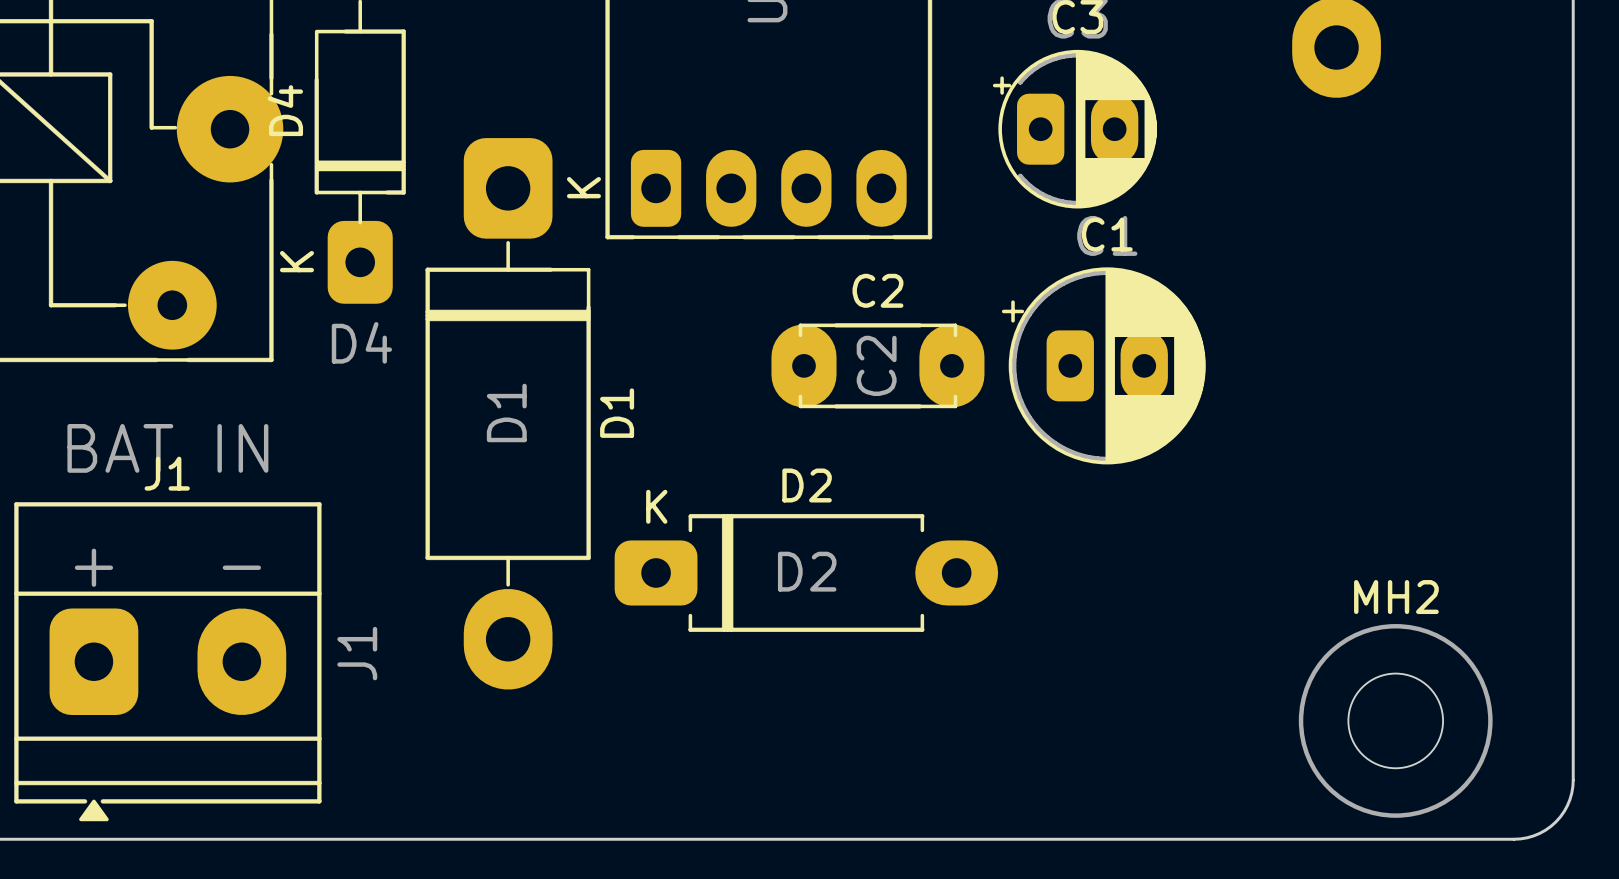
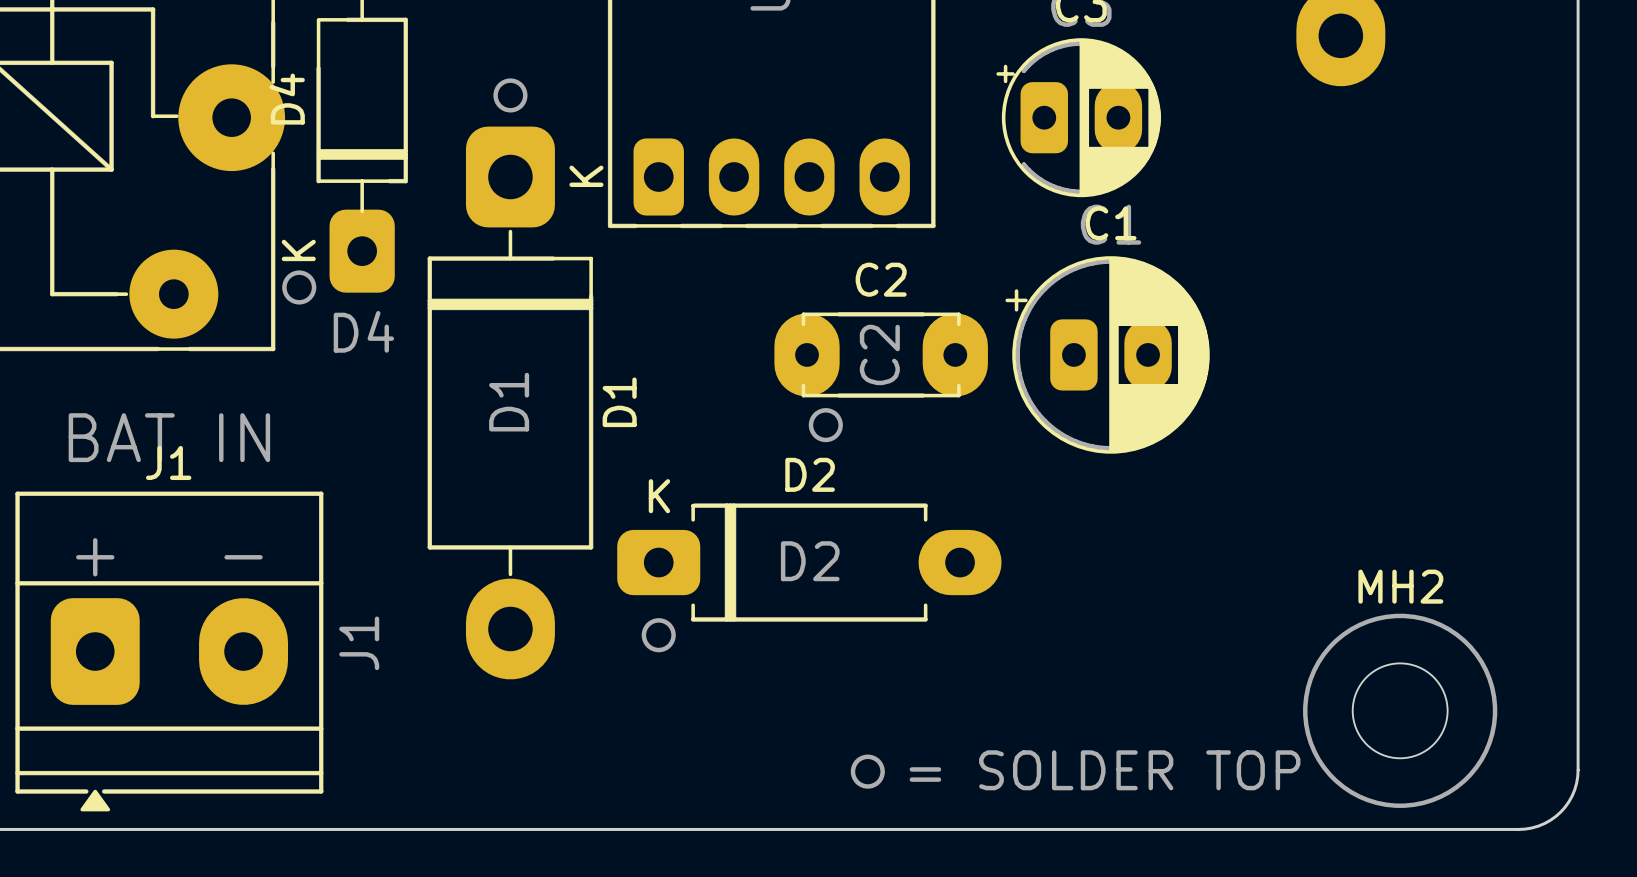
drawing: none -> [493, 78, 528, 113]
drawing: none -> [282, 270, 317, 305]
drawing: none -> [808, 408, 843, 443]
drawing: none -> [641, 618, 676, 653]
drawing: none -> [850, 754, 885, 789]
text: none -> = SOLDER TOP (1105, 770)

